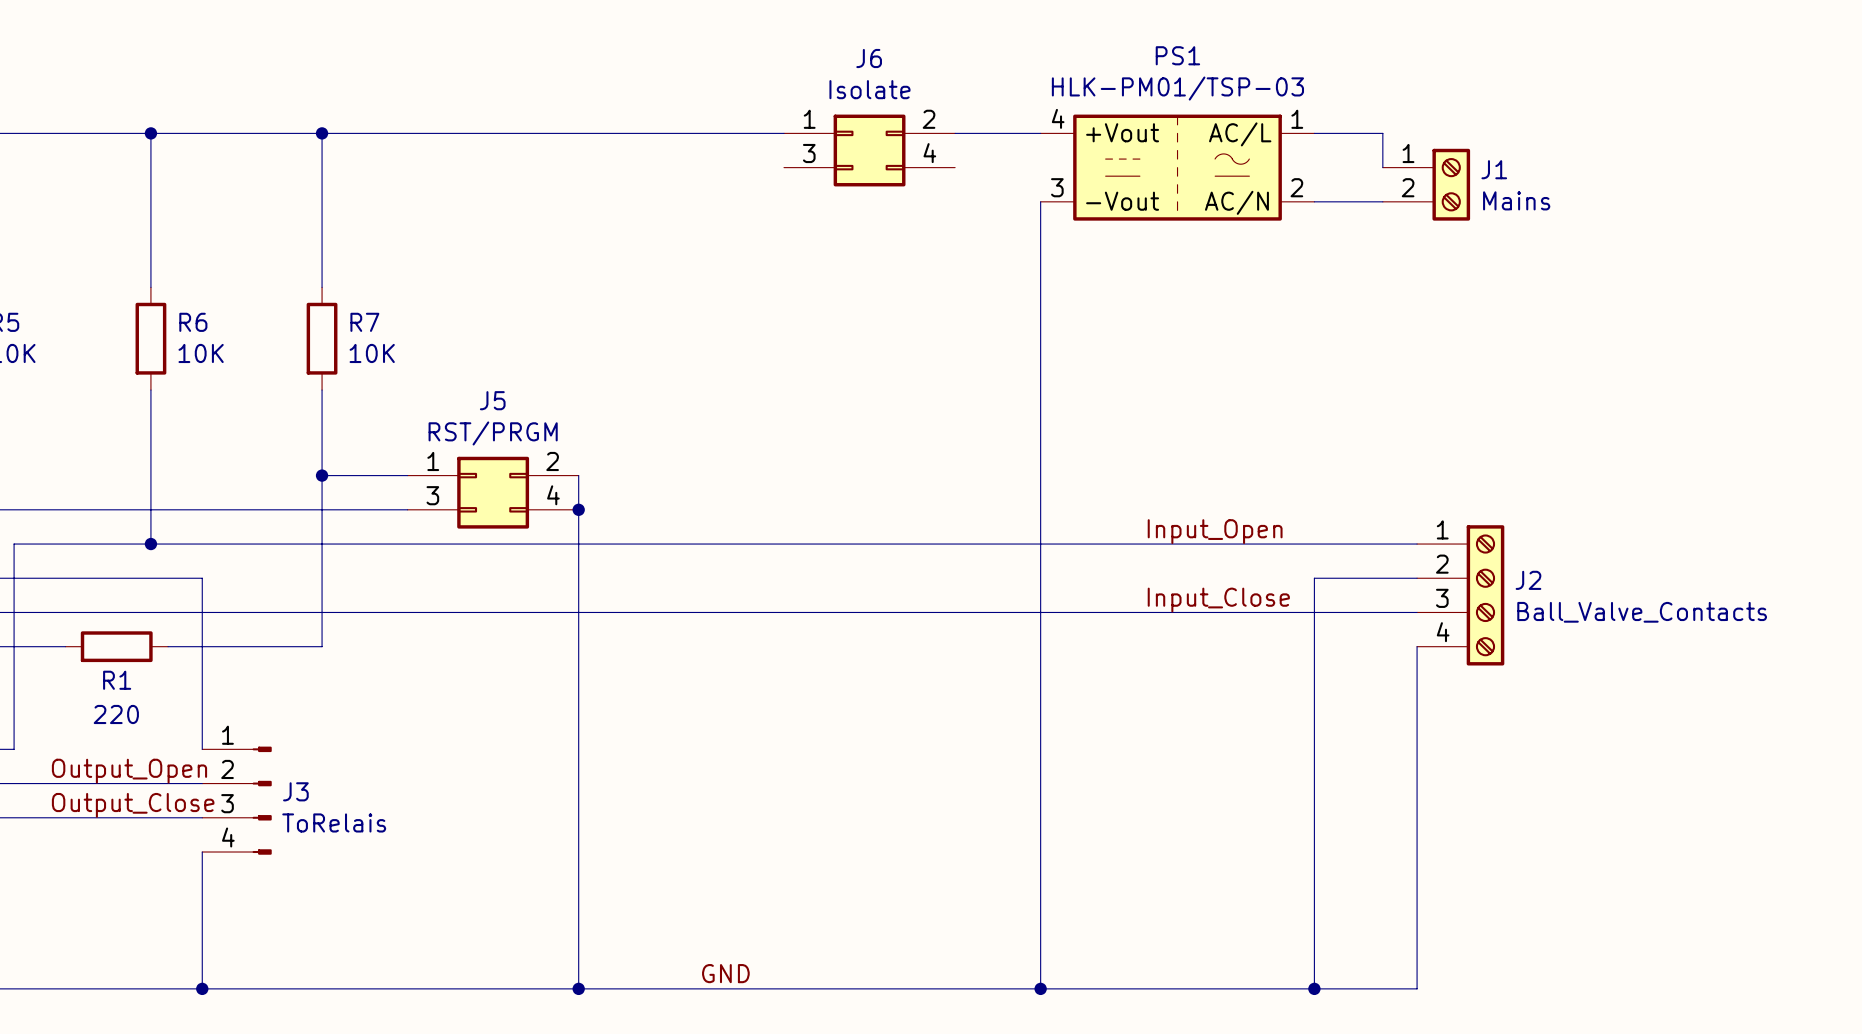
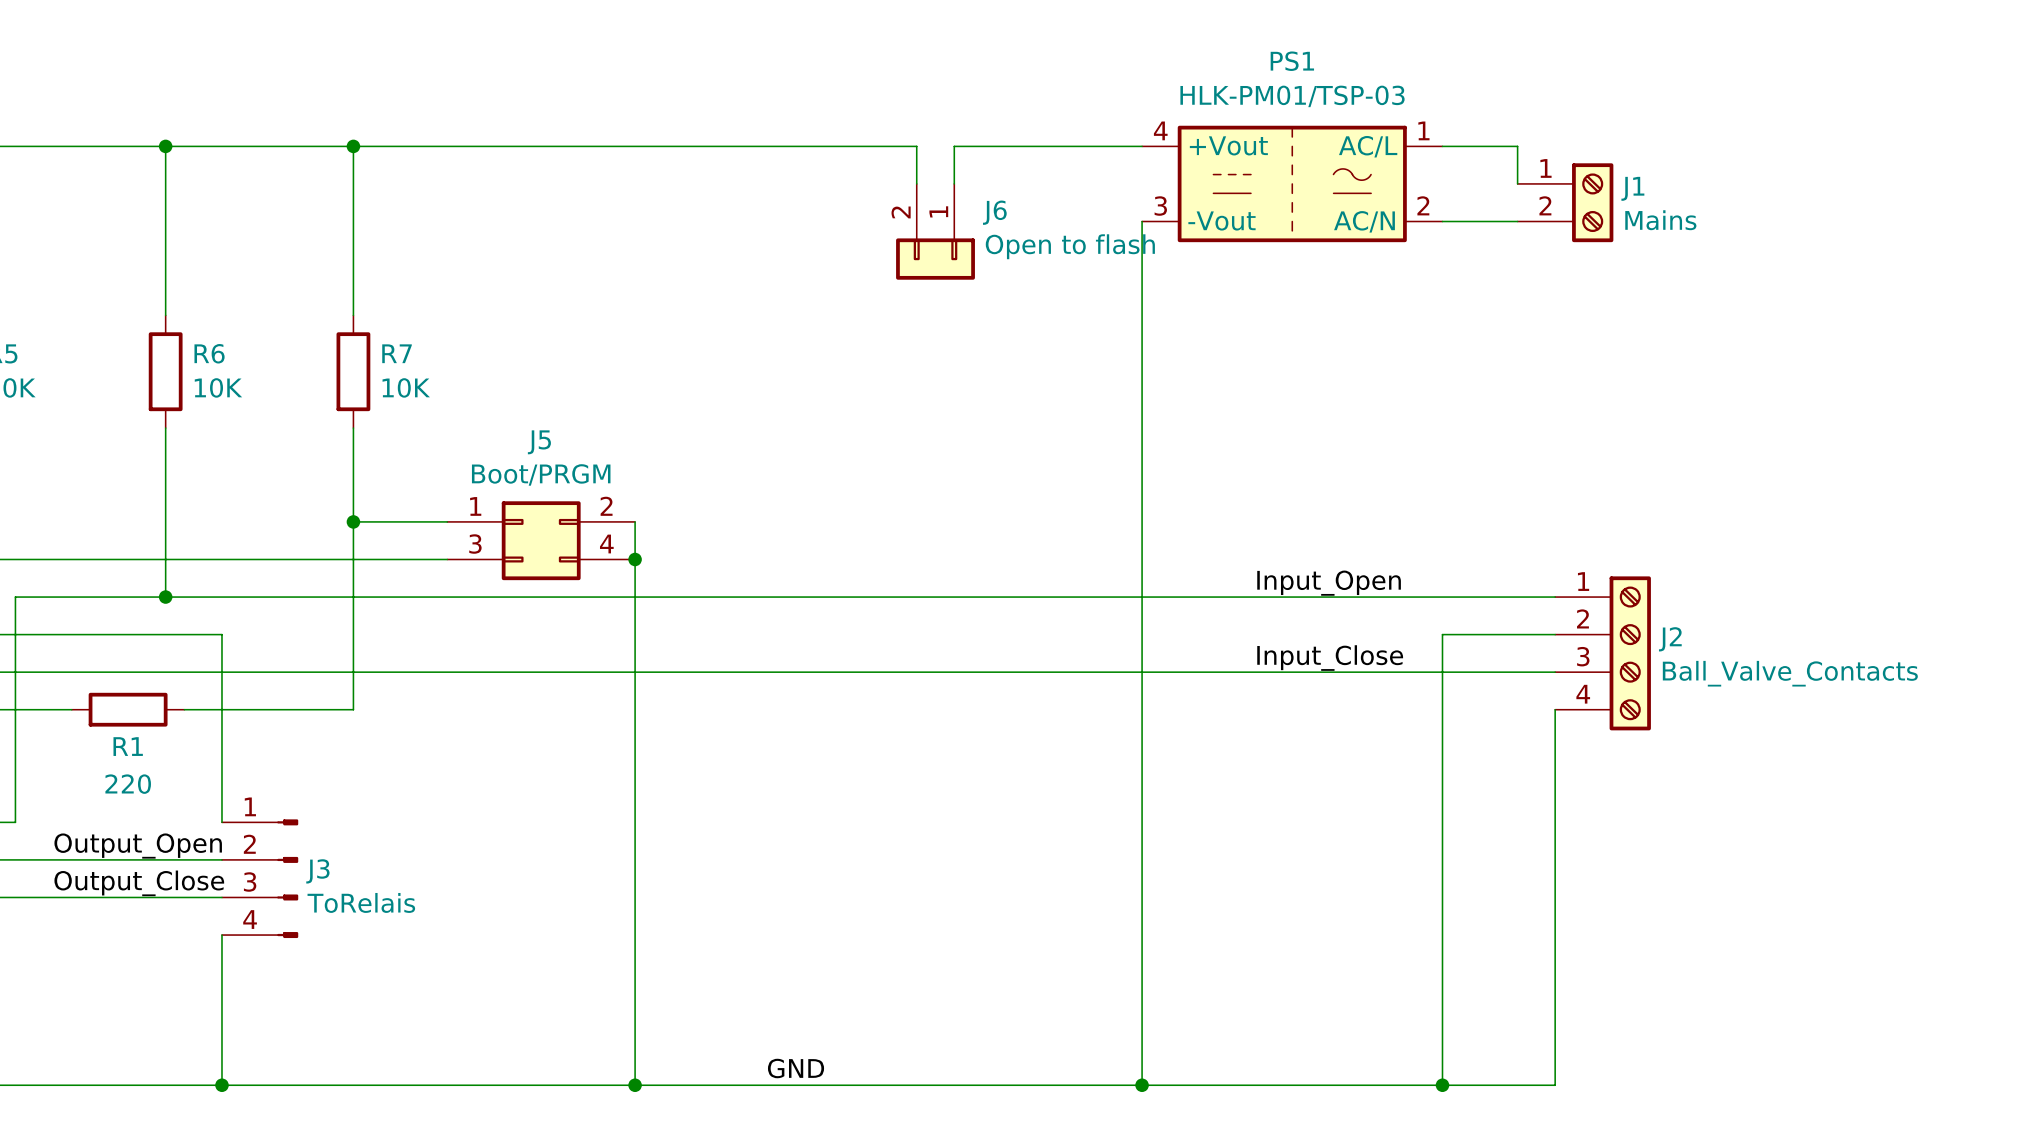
J6 name position: J6 (869, 58) -> J6 (994, 212)
J6 value: Isolate (869, 89) -> Open to flash (1070, 246)
J6 symbol: [784, 114, 956, 187] -> [896, 183, 975, 280]
J5 value: RST/PRGM (493, 433) -> Boot/PRGM (541, 474)

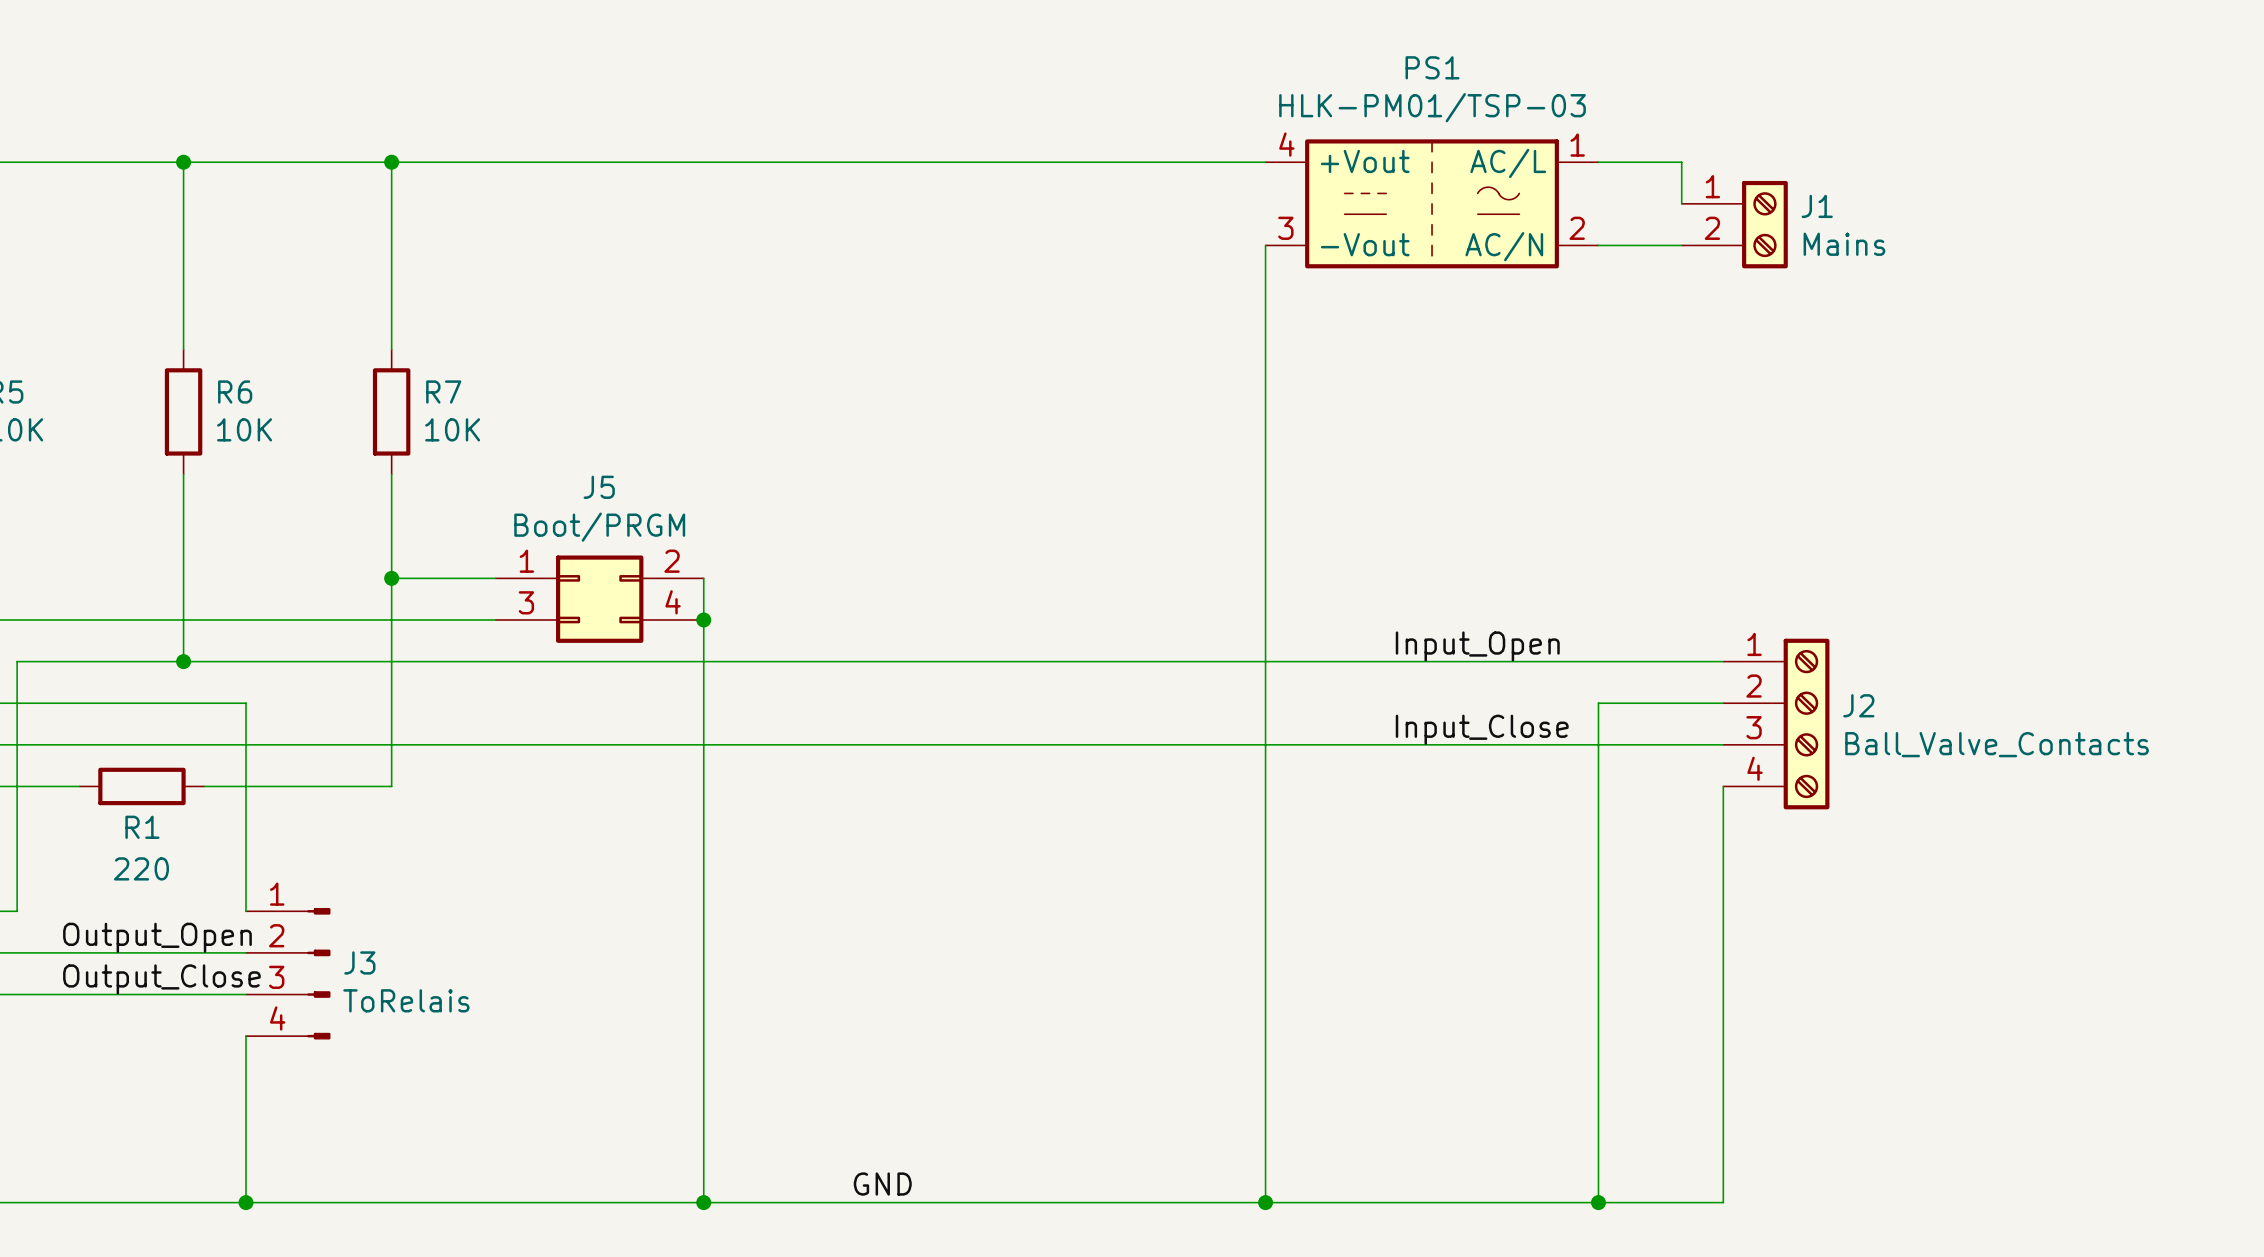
wire: (916, 146) (916, 183) -> (1015, 162) (1057, 162)
wire: (954, 146) (954, 183) -> none
J6: Open to flash (935, 231) -> none

